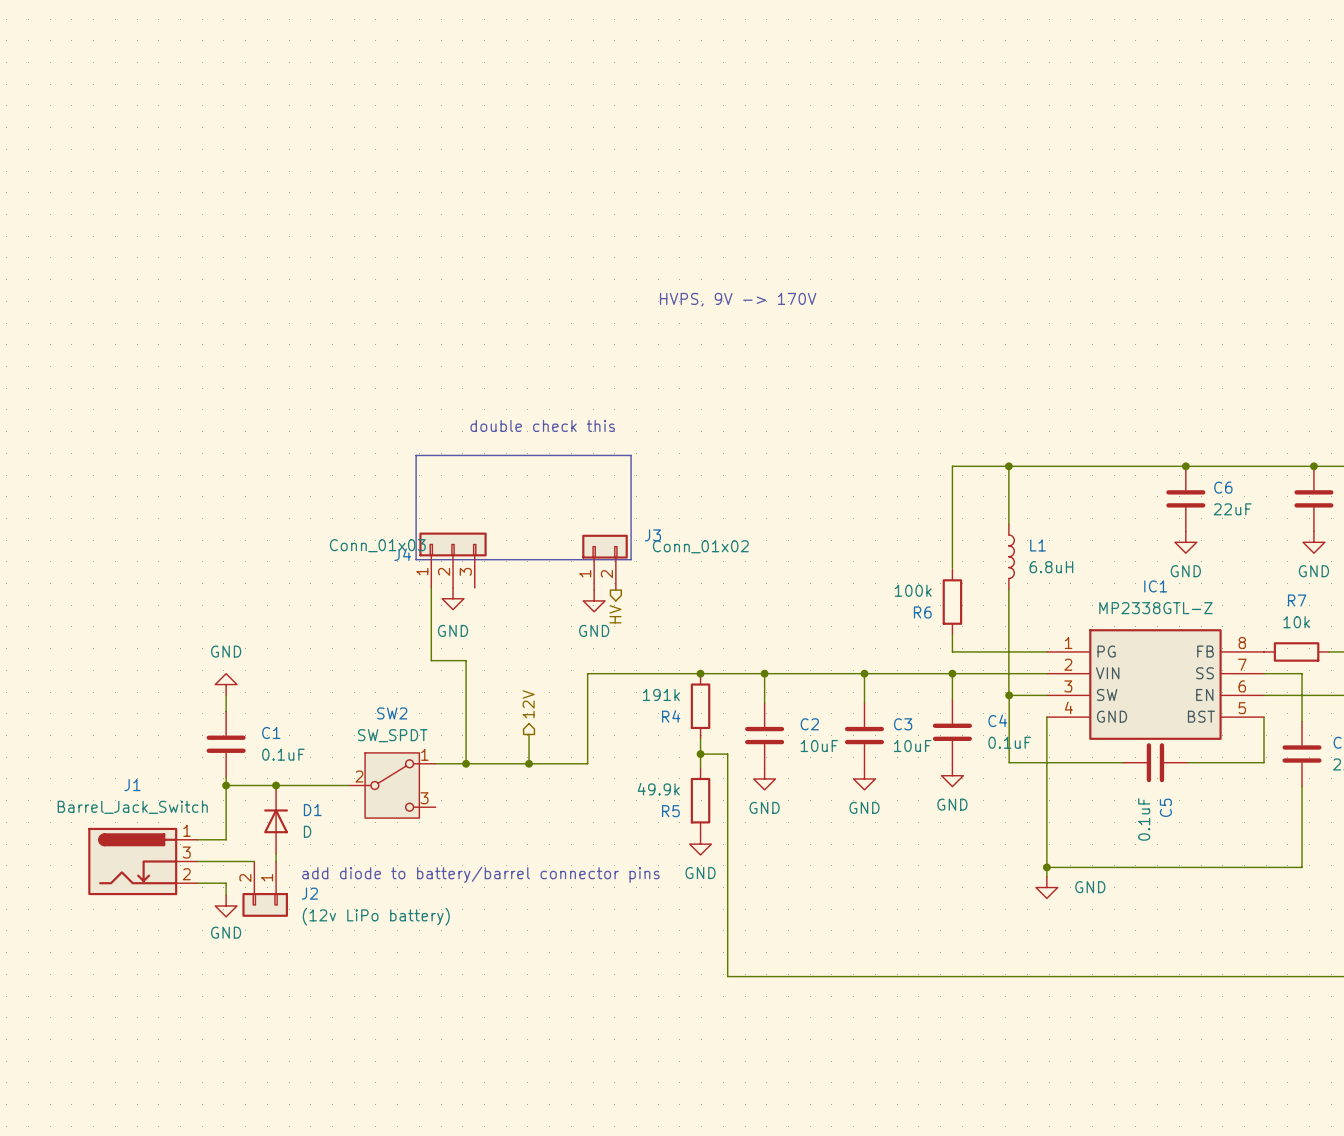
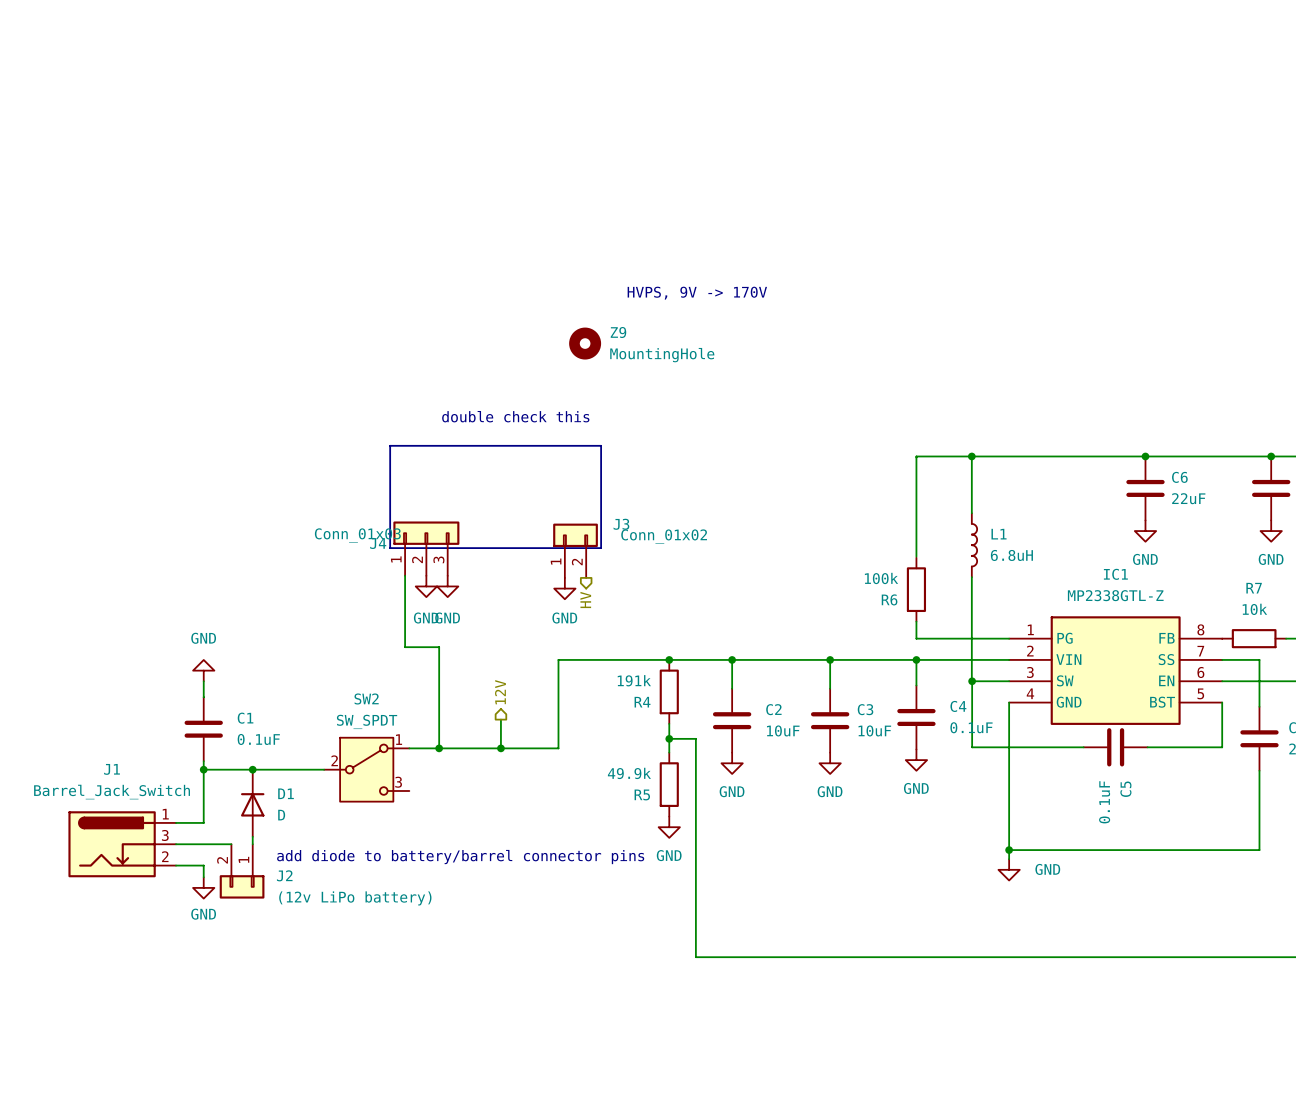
Z9: none -> MountingHole (585, 343)
power symbol: none -> GND (447, 586)

